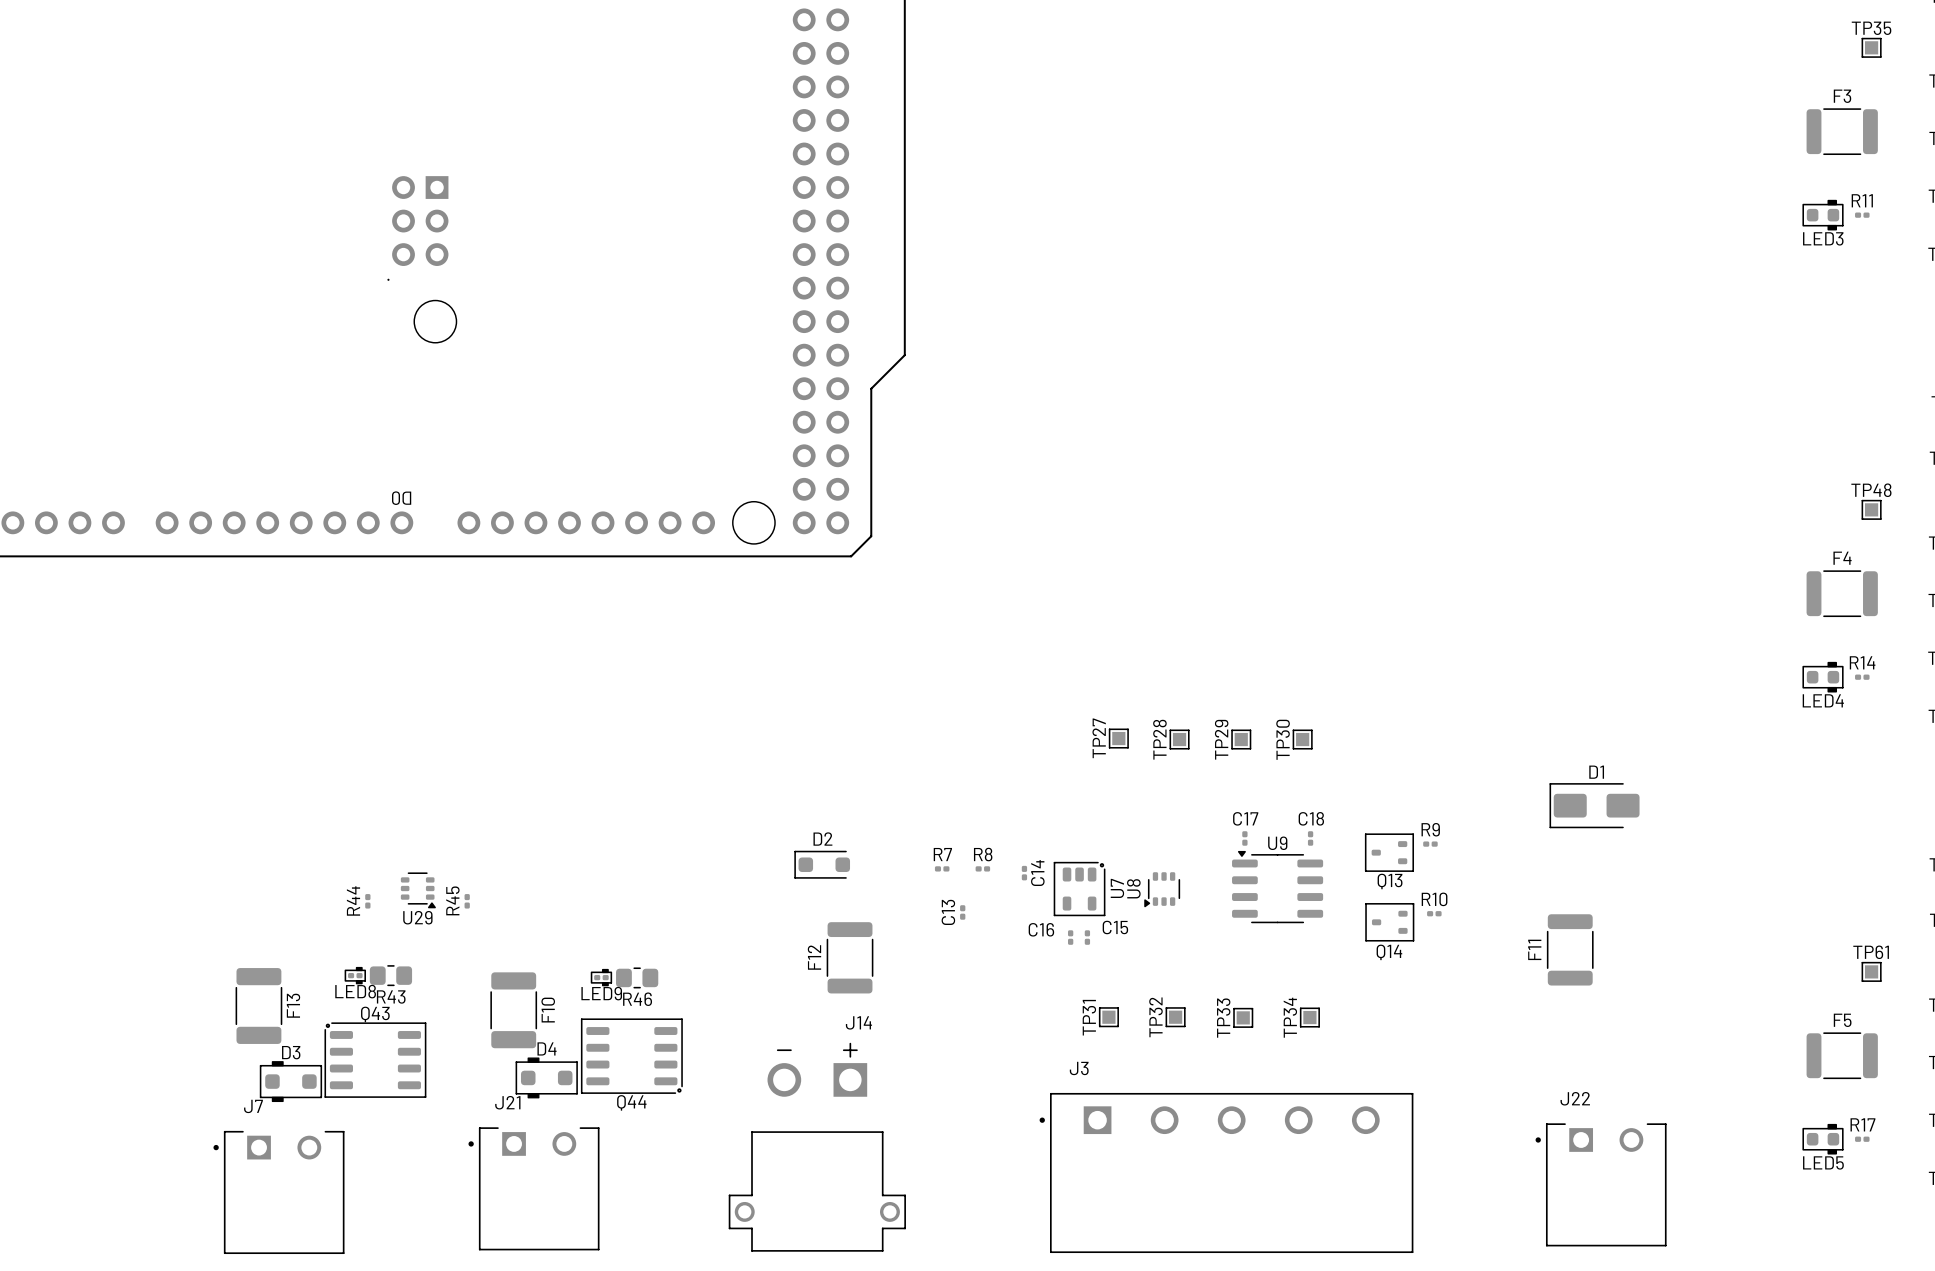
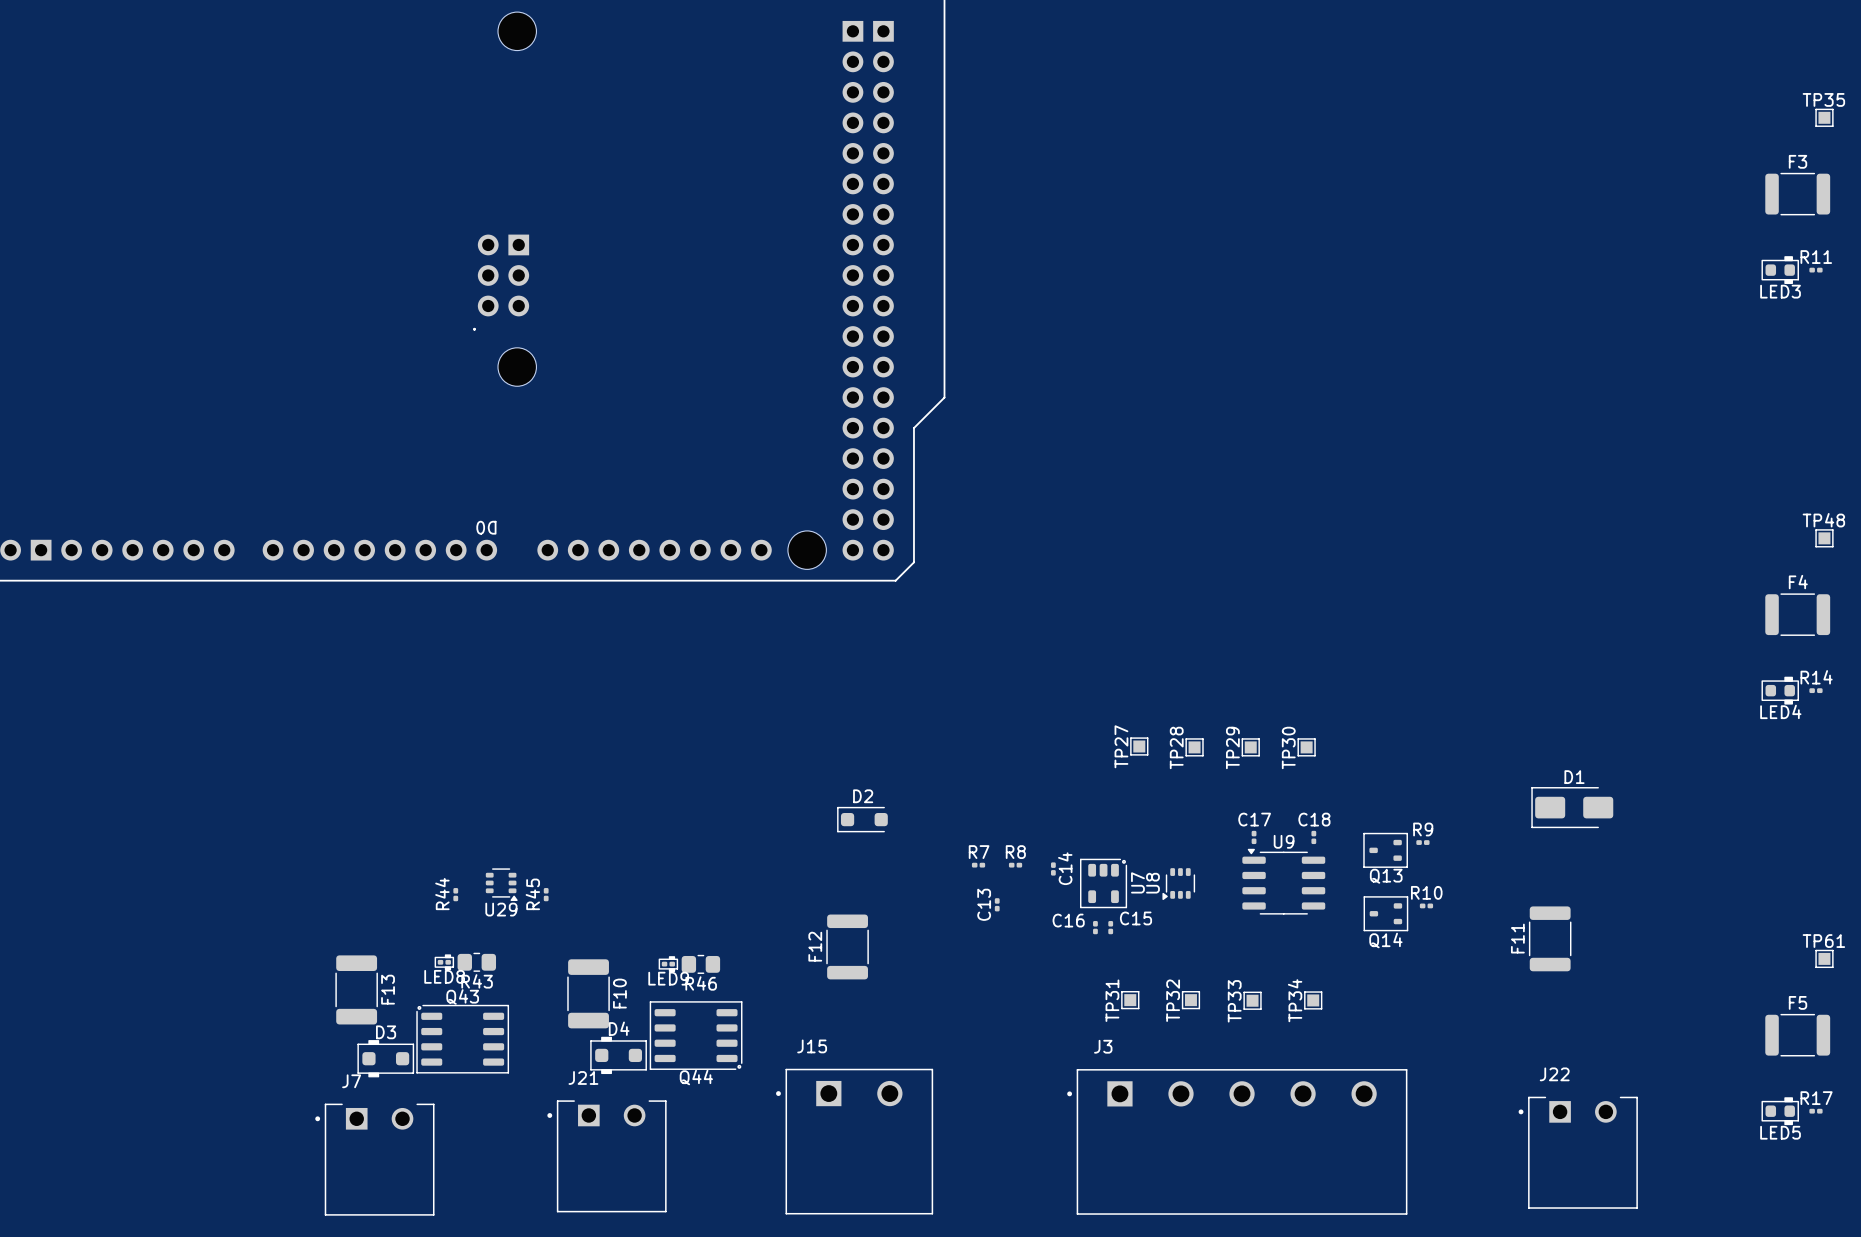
D2 position: (822, 864) -> (862, 819)
F12 position: (850, 957) -> (847, 946)
J14: (817, 1147) -> none
J15: none -> (854, 1141)

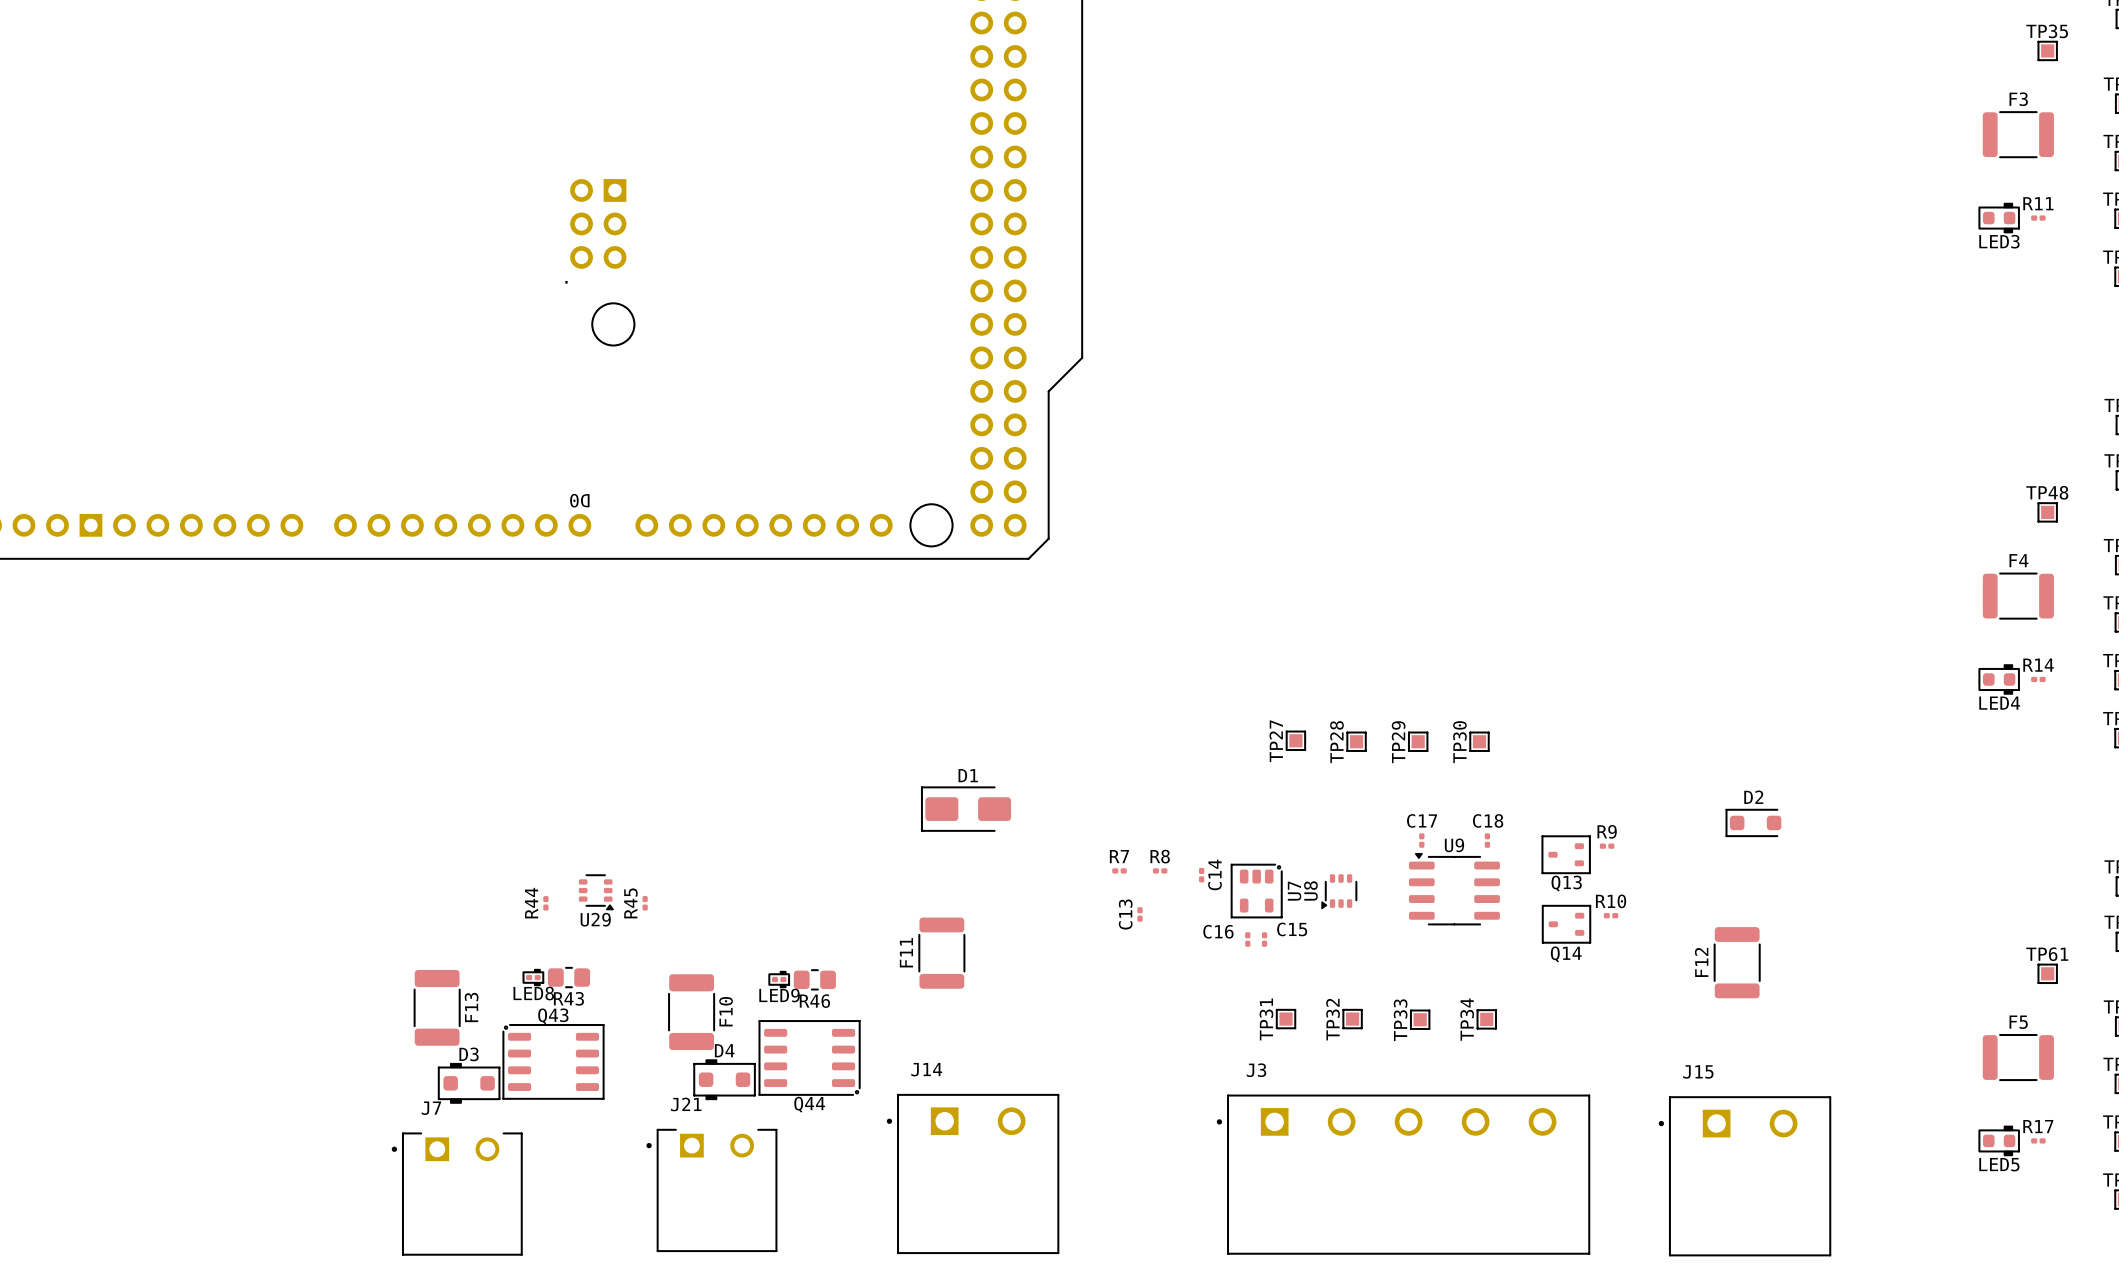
D1 position: (1572, 807) -> (966, 809)
D2 position: (862, 819) -> (1753, 822)
F11 position: (1550, 938) -> (941, 953)
F12 position: (847, 946) -> (1737, 962)
J14: none -> (972, 1173)
J15 position: (854, 1141) -> (1744, 1176)
J22: (1578, 1152) -> none

